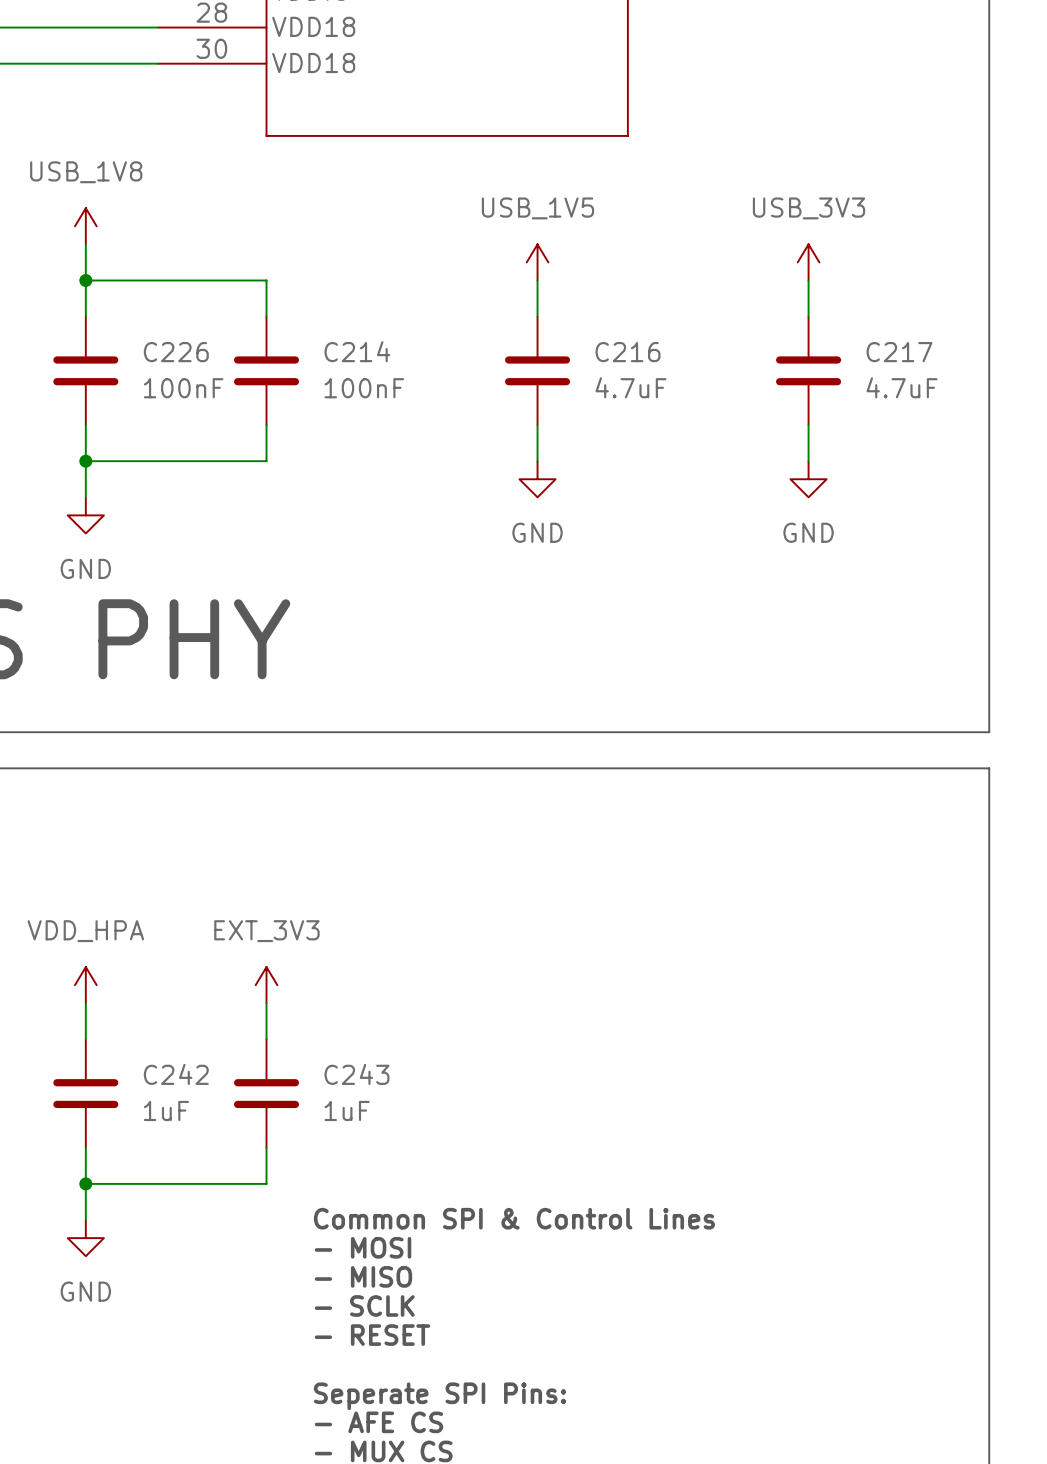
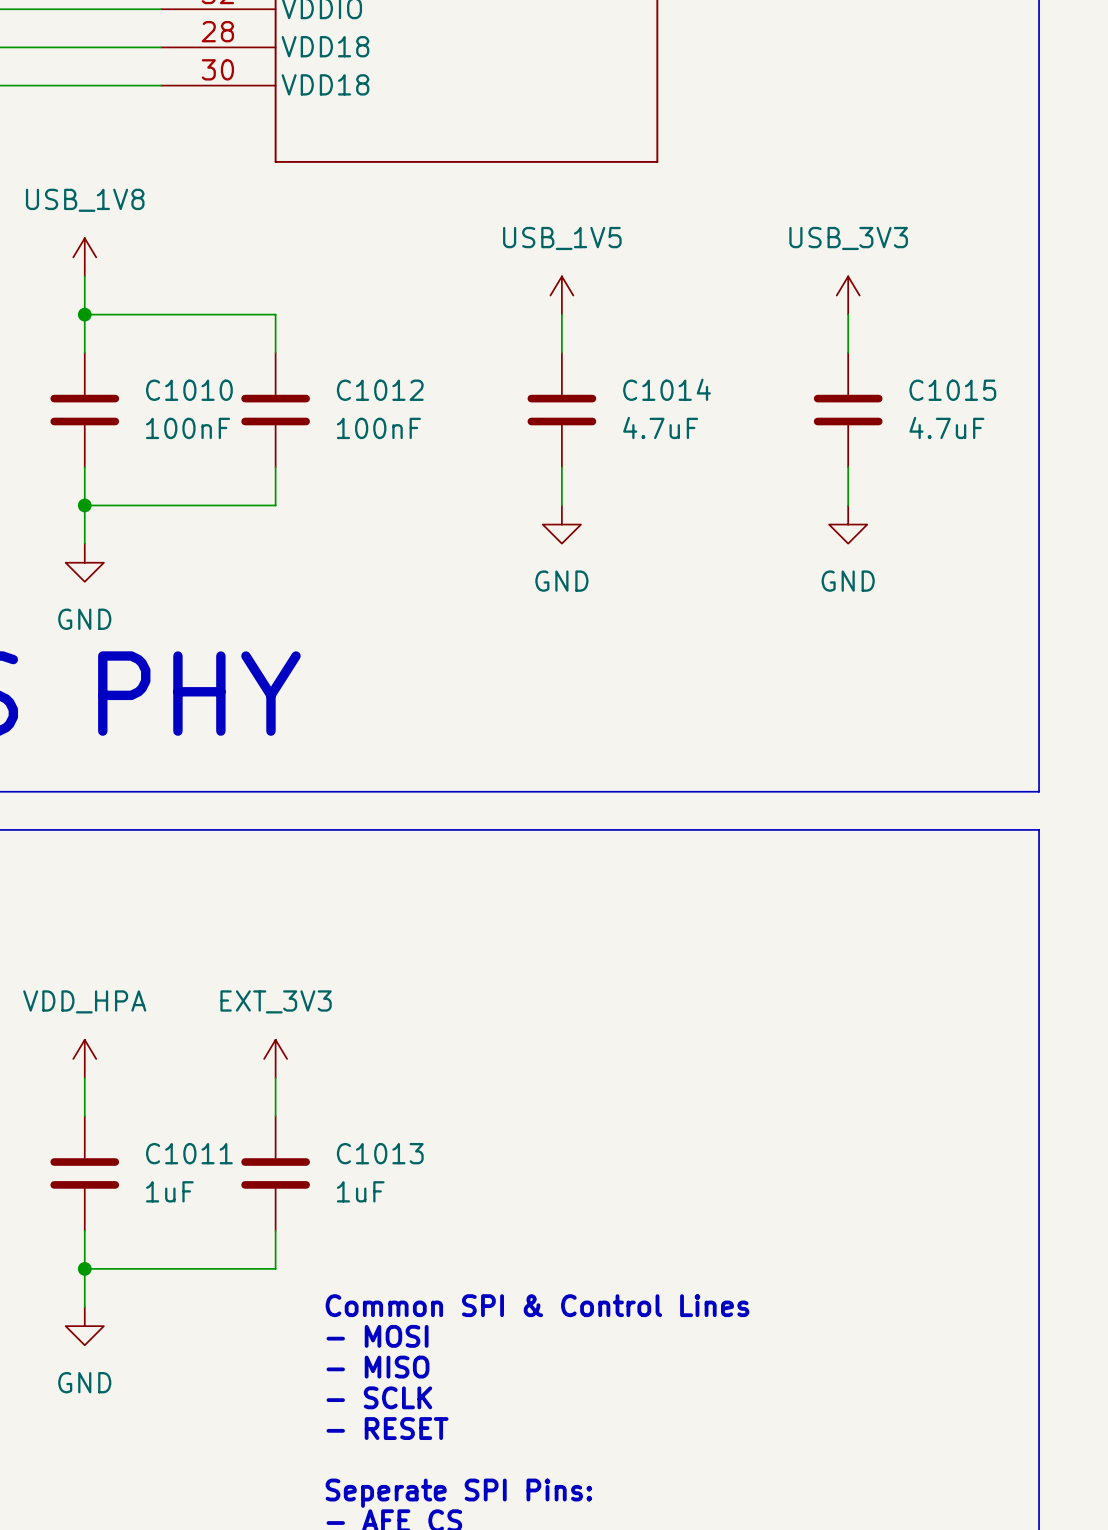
C214 name: C214 (357, 351) -> C1012 (380, 390)
C226 name: C226 (176, 352) -> C1010 (189, 390)
C216 name: C216 (628, 352) -> C1014 (667, 389)
C217 name: C217 (899, 352) -> C1015 (952, 390)
C242 name: C242 (176, 1074) -> C1011 (189, 1153)
C243 name: C243 (356, 1074) -> C1013 (380, 1153)

